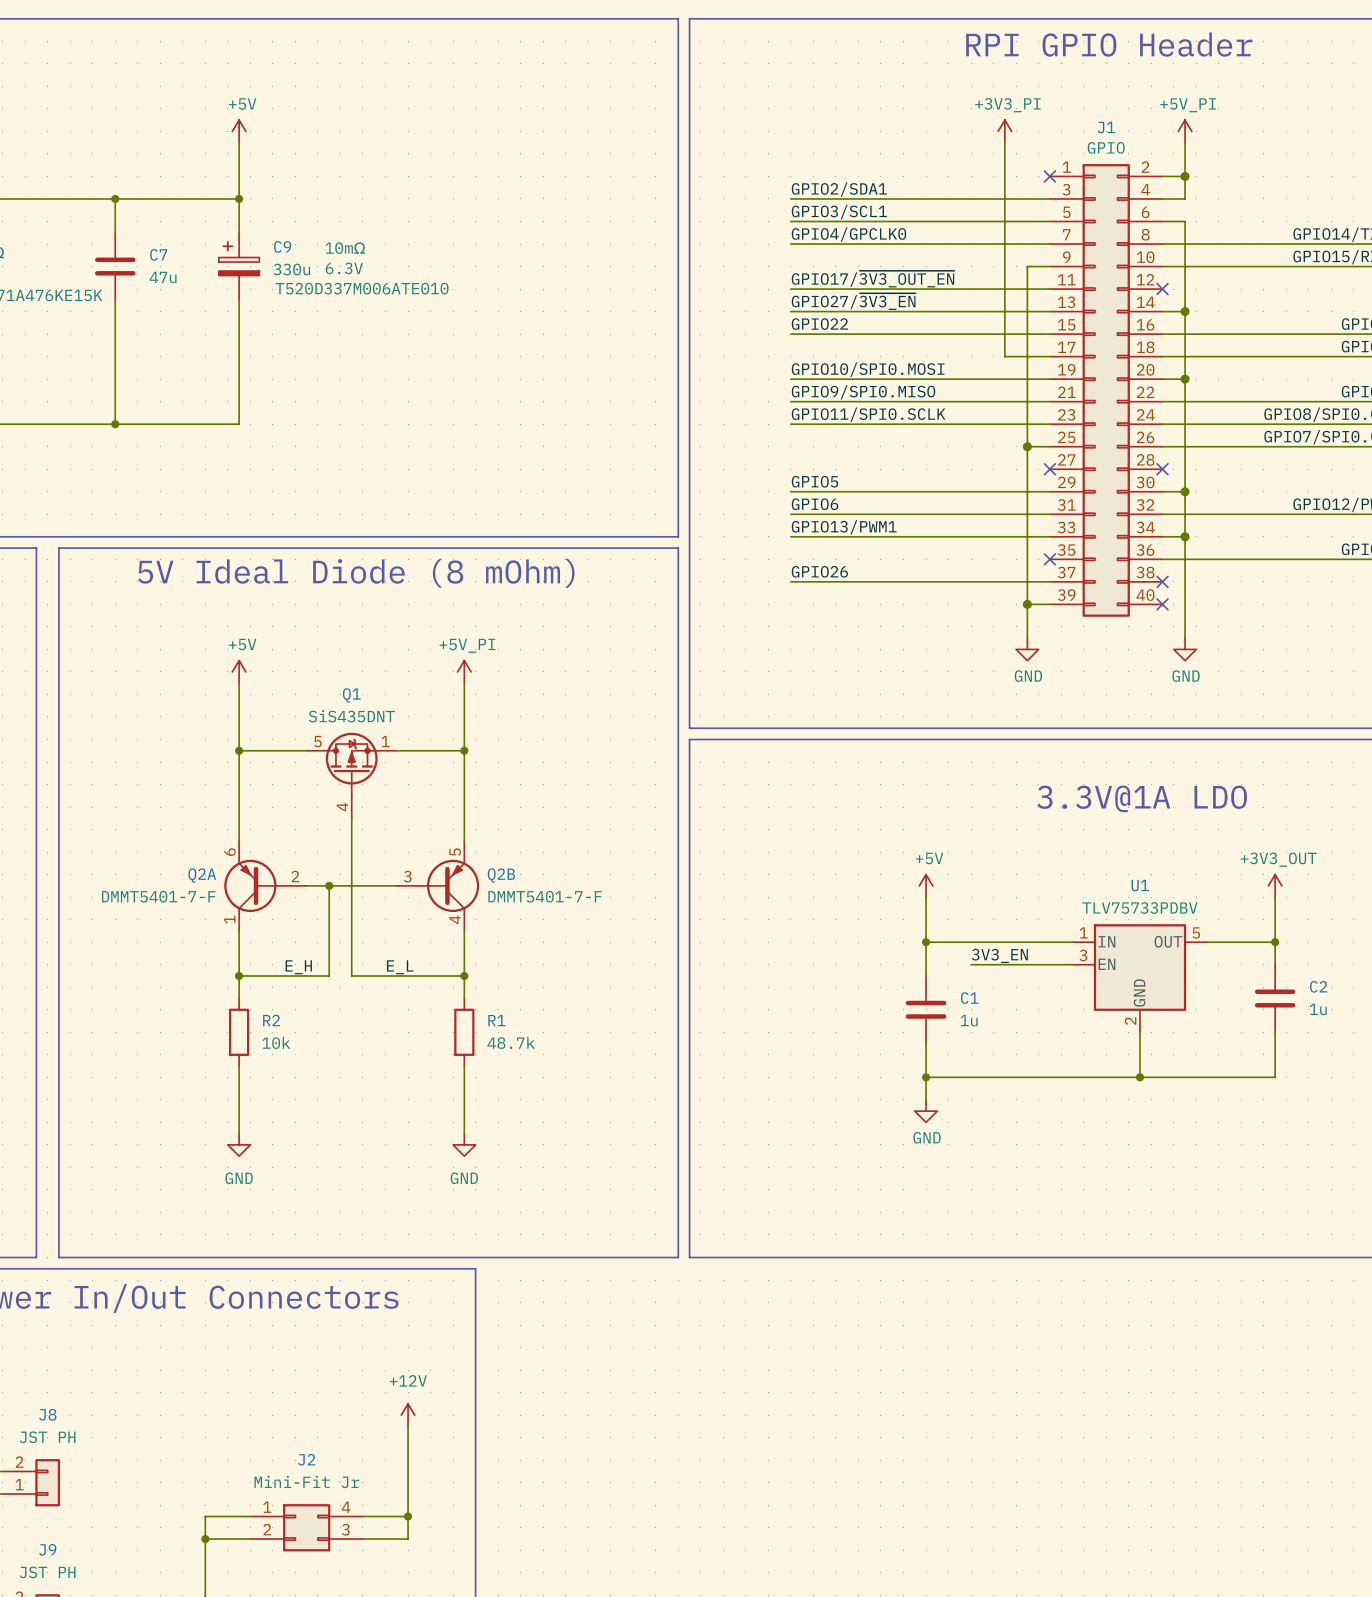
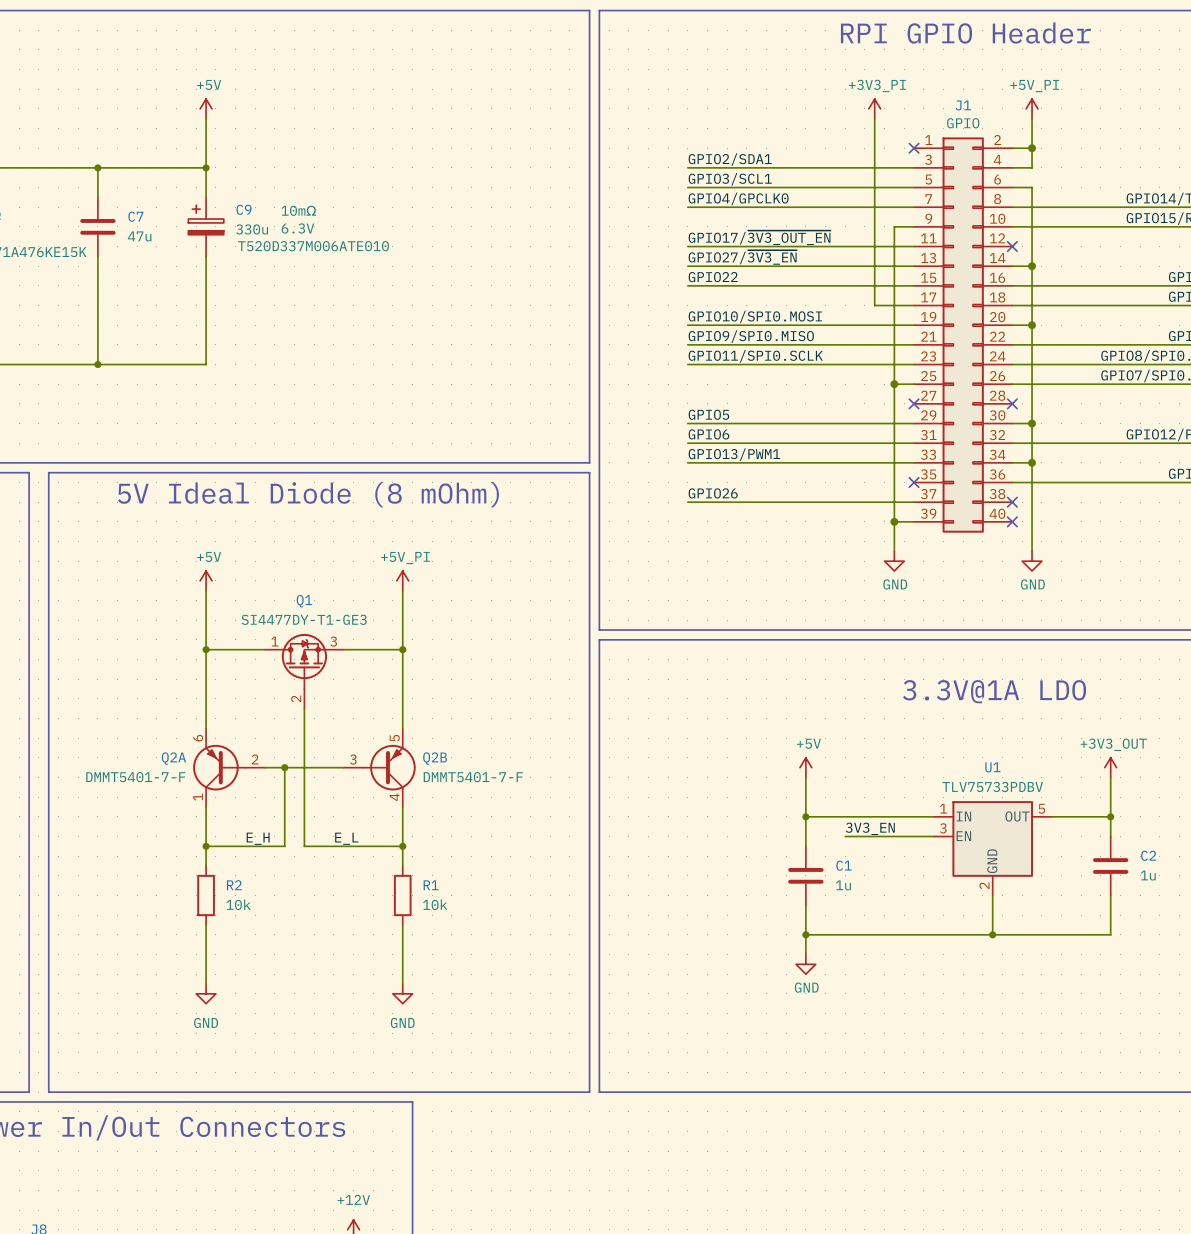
Q1 value: SiS435DNT (351, 716) -> SI4477DY-T1-GE3 (304, 619)
Q1 pin number: 5 (317, 741) -> 1 (274, 641)
Q1 pin number: 1 (385, 741) -> 3 (333, 641)
Q1 pin number: 4 (342, 807) -> 2 (296, 698)
R1 value: 48.7k (511, 1042) -> 10k (435, 904)

